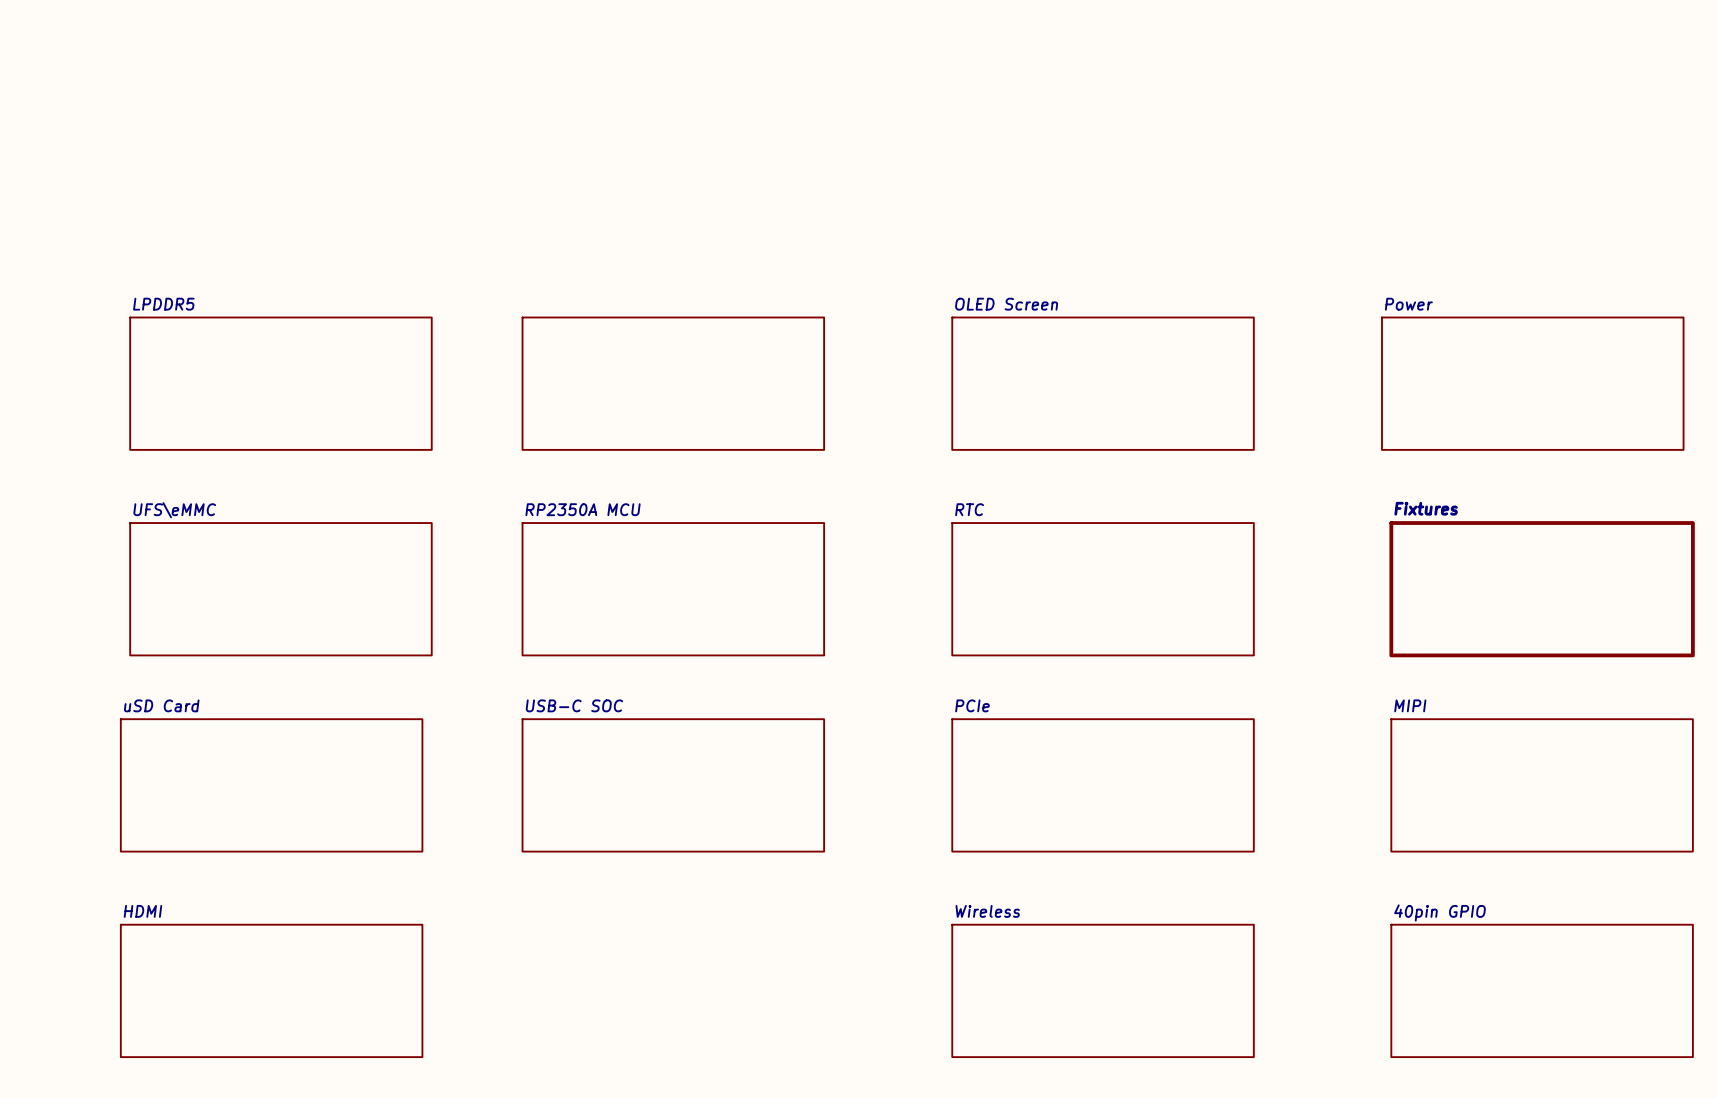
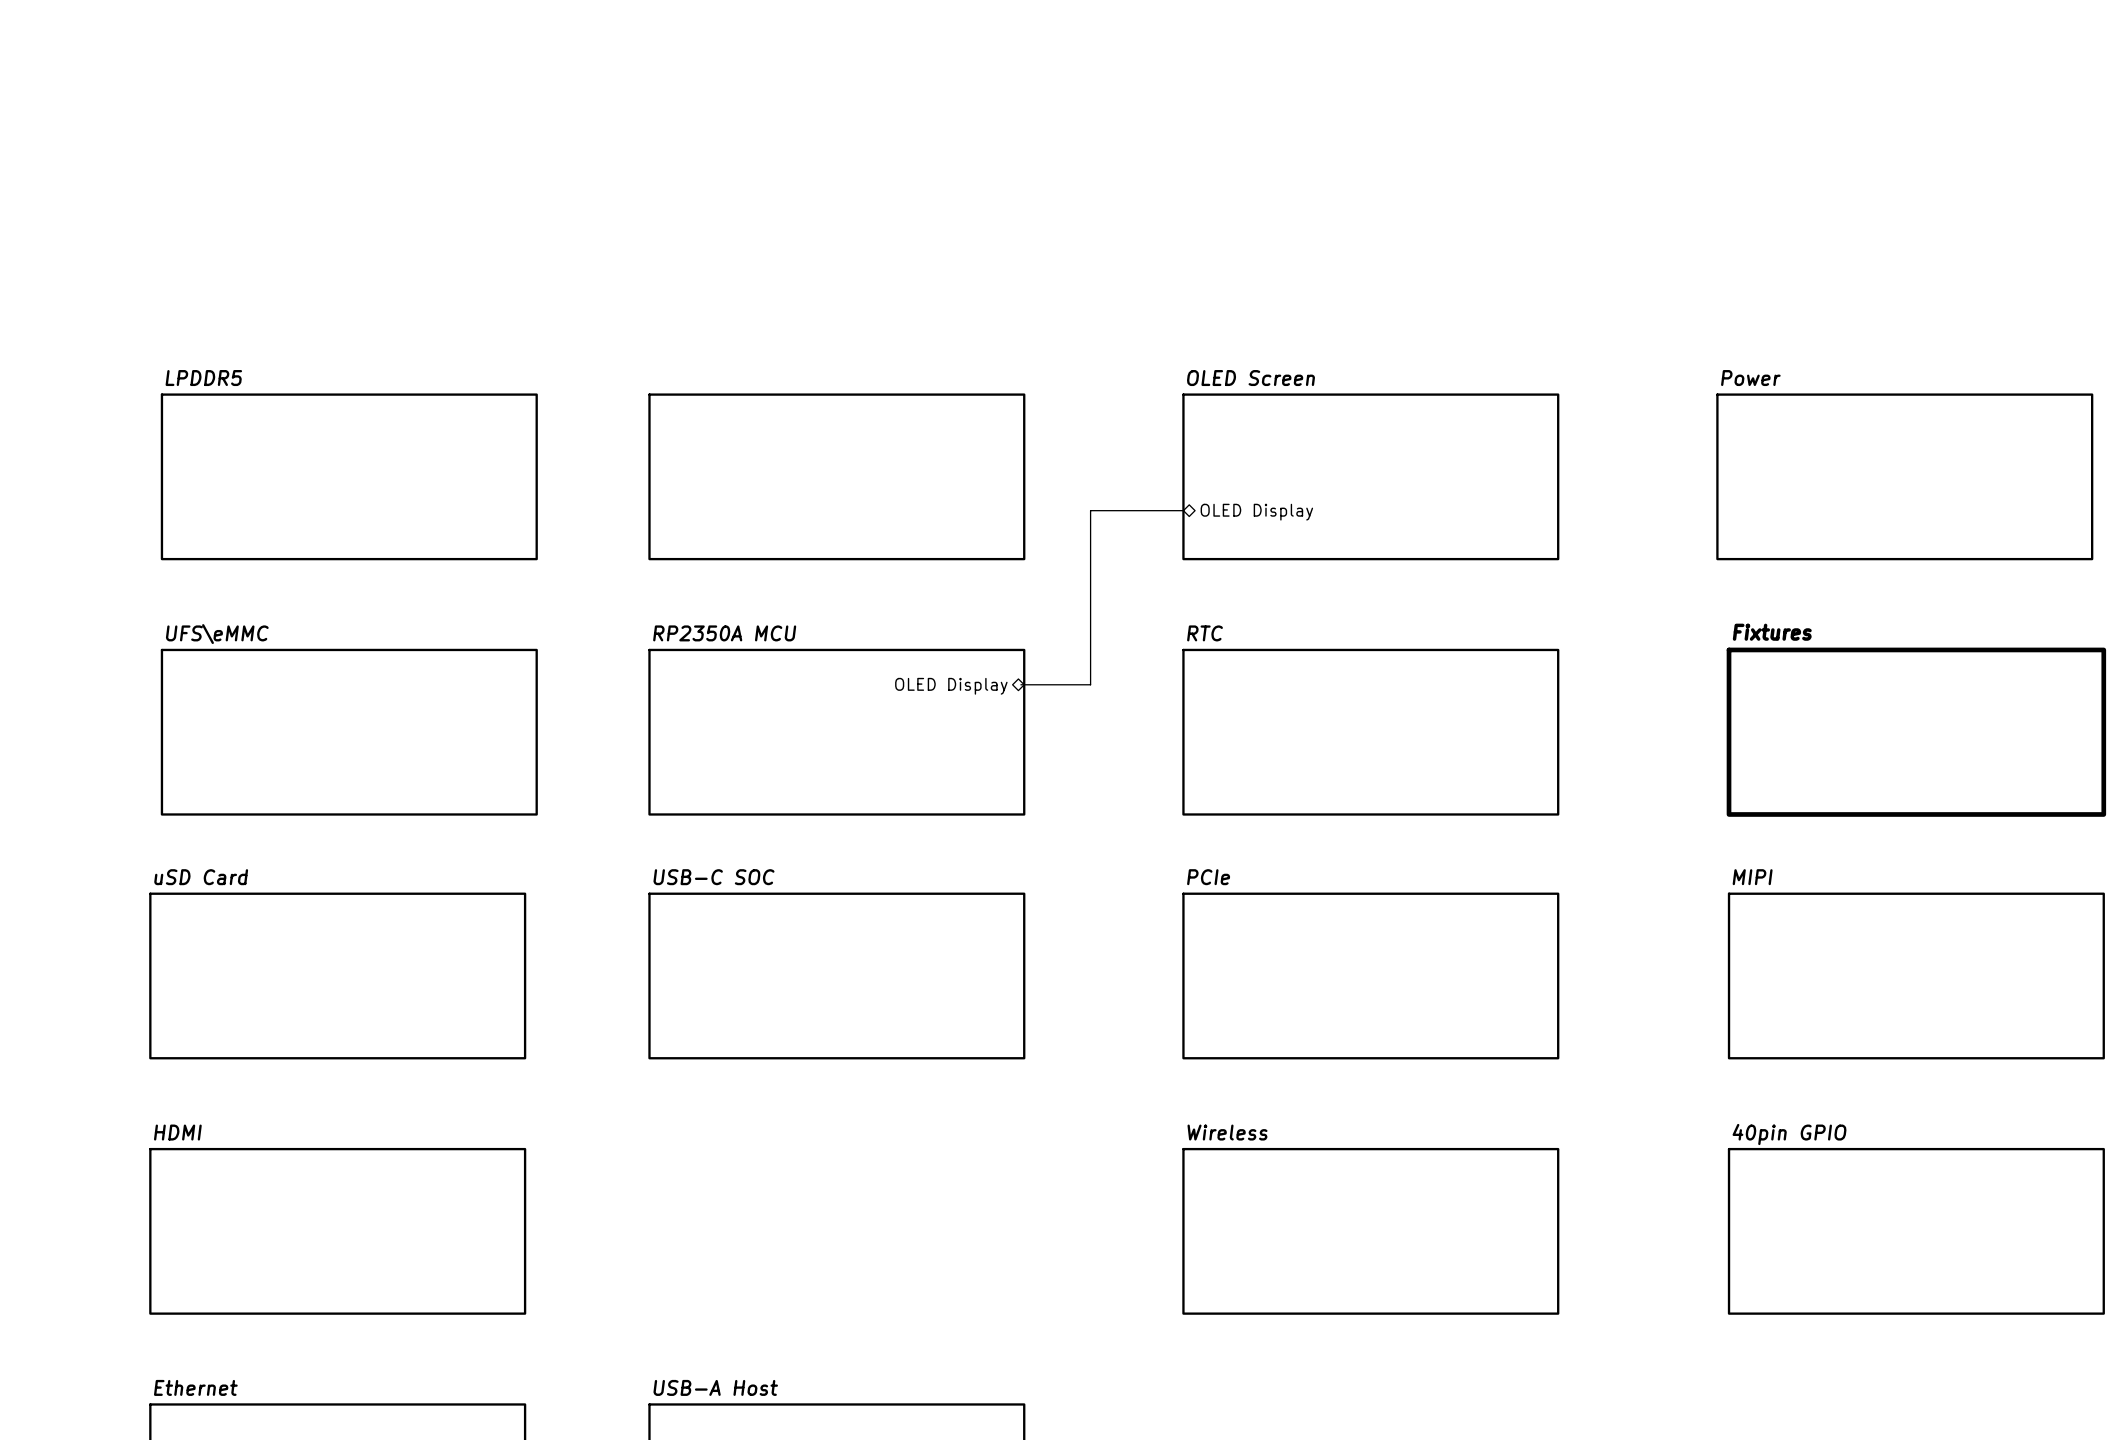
bus: none -> (1183, 510) (1090, 510) (1090, 684) (1020, 684)
sheet pin: none -> OLED Display (1256, 512)
sheet pin: none -> OLED Display (951, 686)

